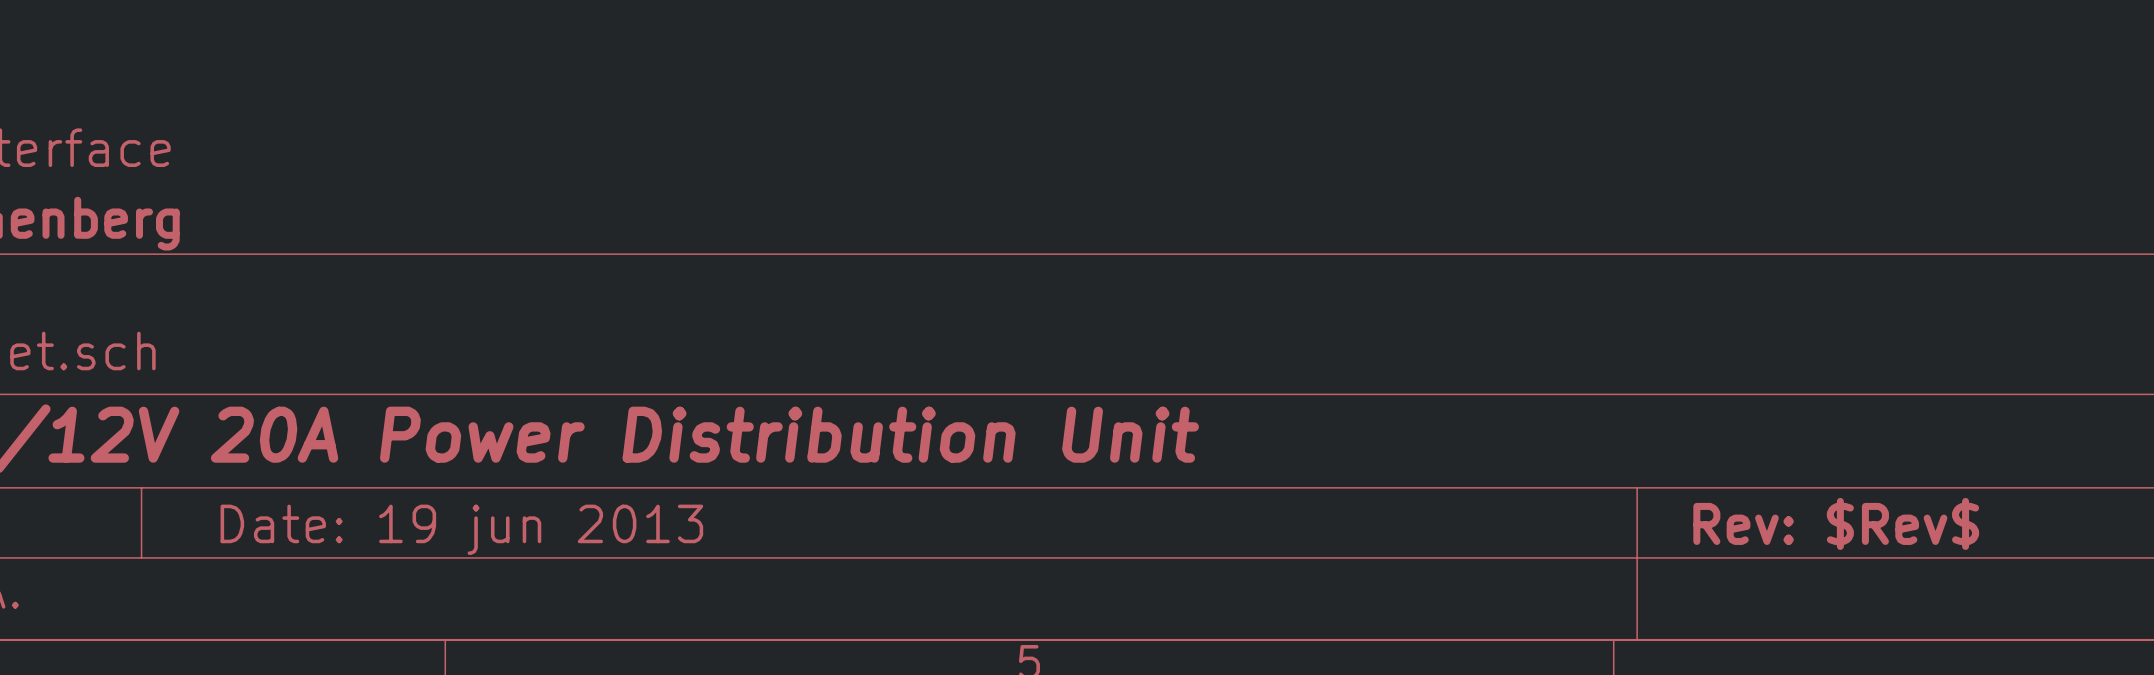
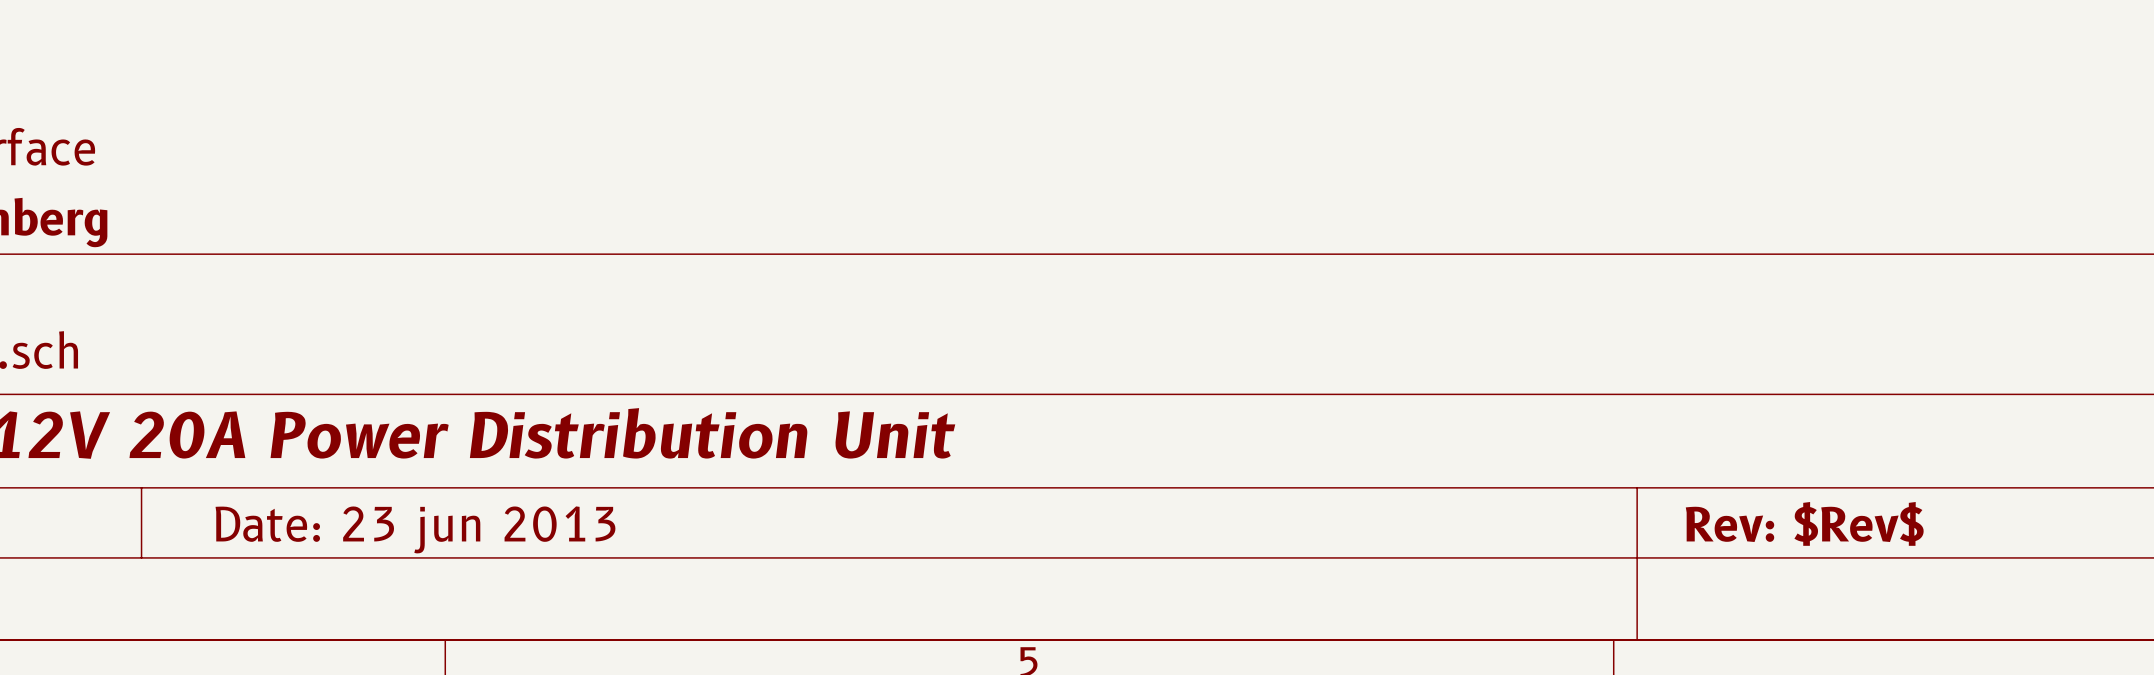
title block: Date: 19 jun 2013 (461, 529) -> Date: 23 jun 2013 (415, 529)

